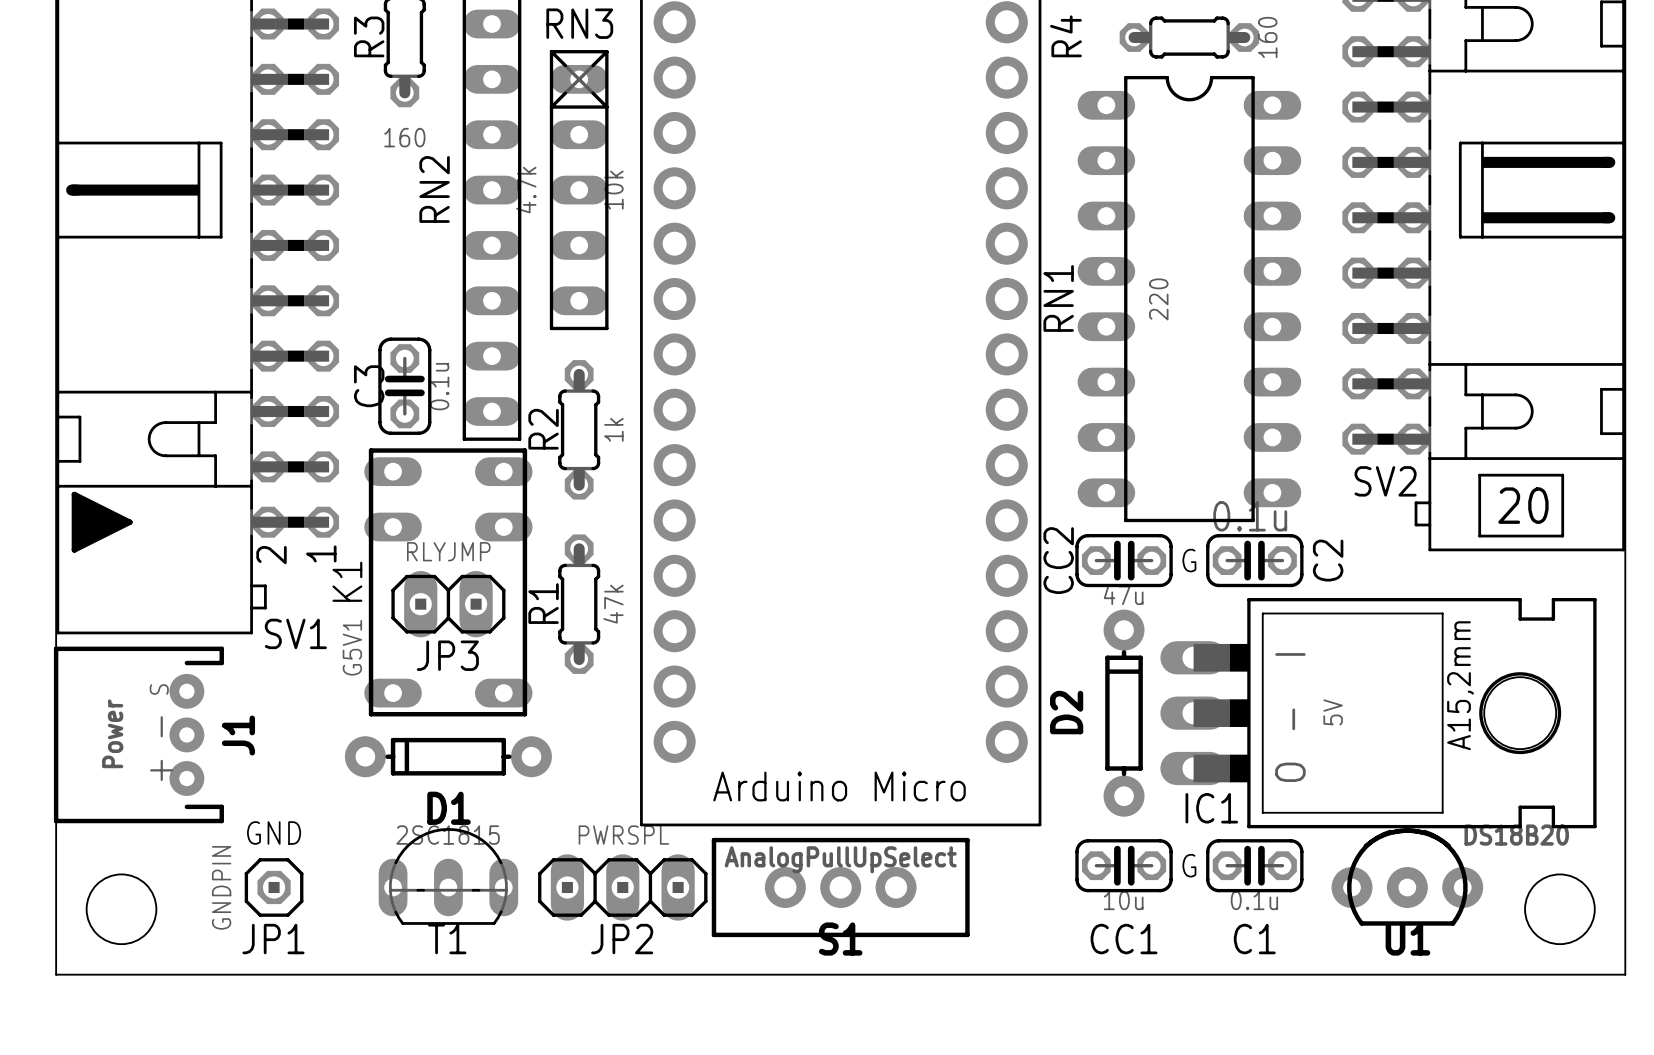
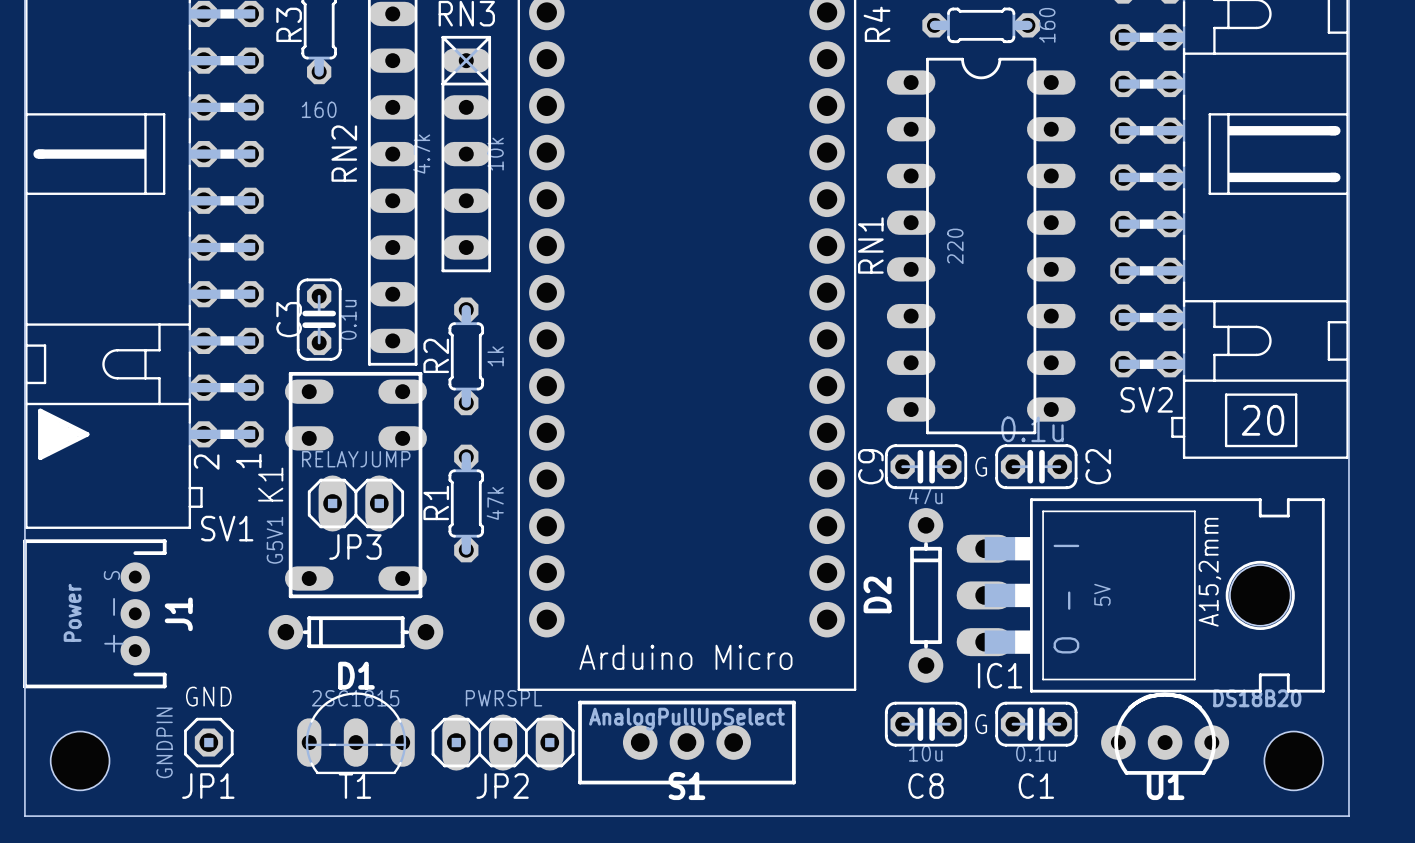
JP3 value: RLYJMP (448, 551) -> RELAYJUMP (356, 459)
CC2 name: CC2 (1058, 560) -> C9 (870, 466)
CC1 name: CC1 (1124, 939) -> C8 (926, 786)

